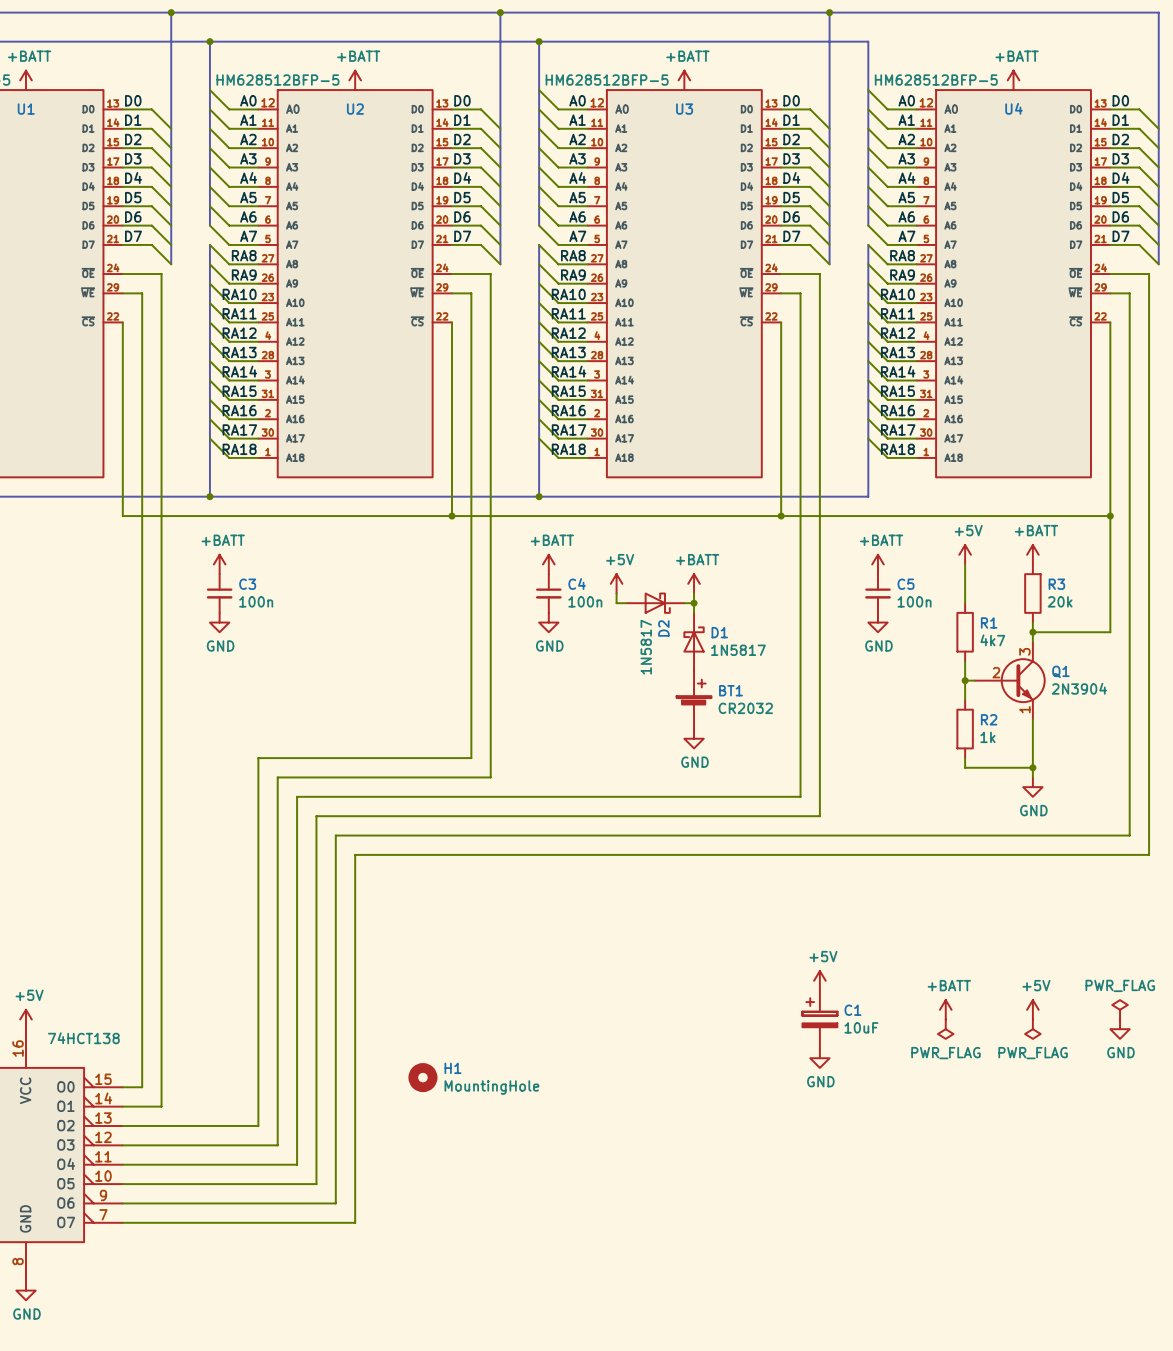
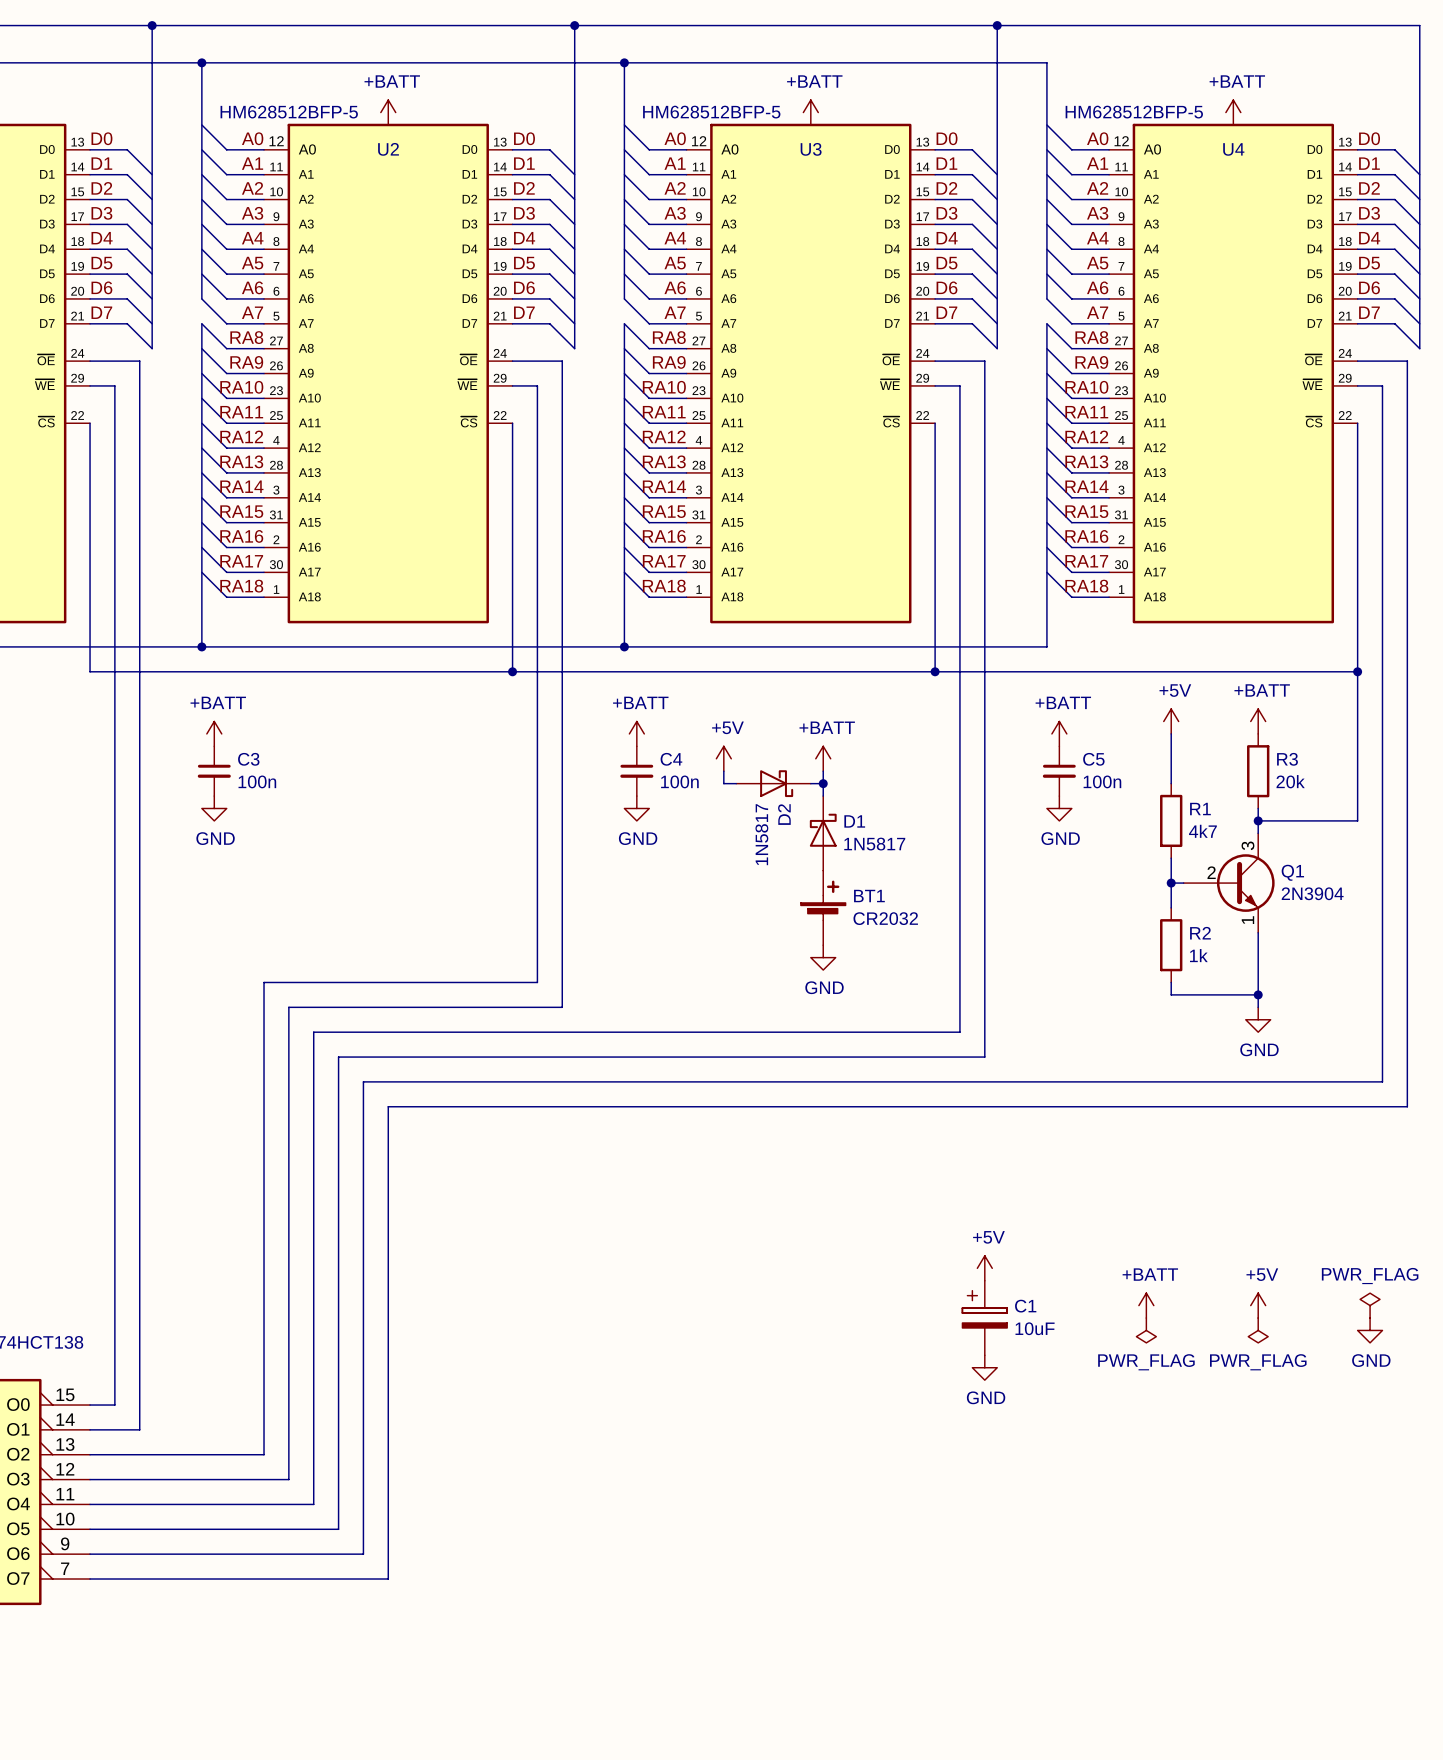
H1: MountingHole (422, 1077) -> none

